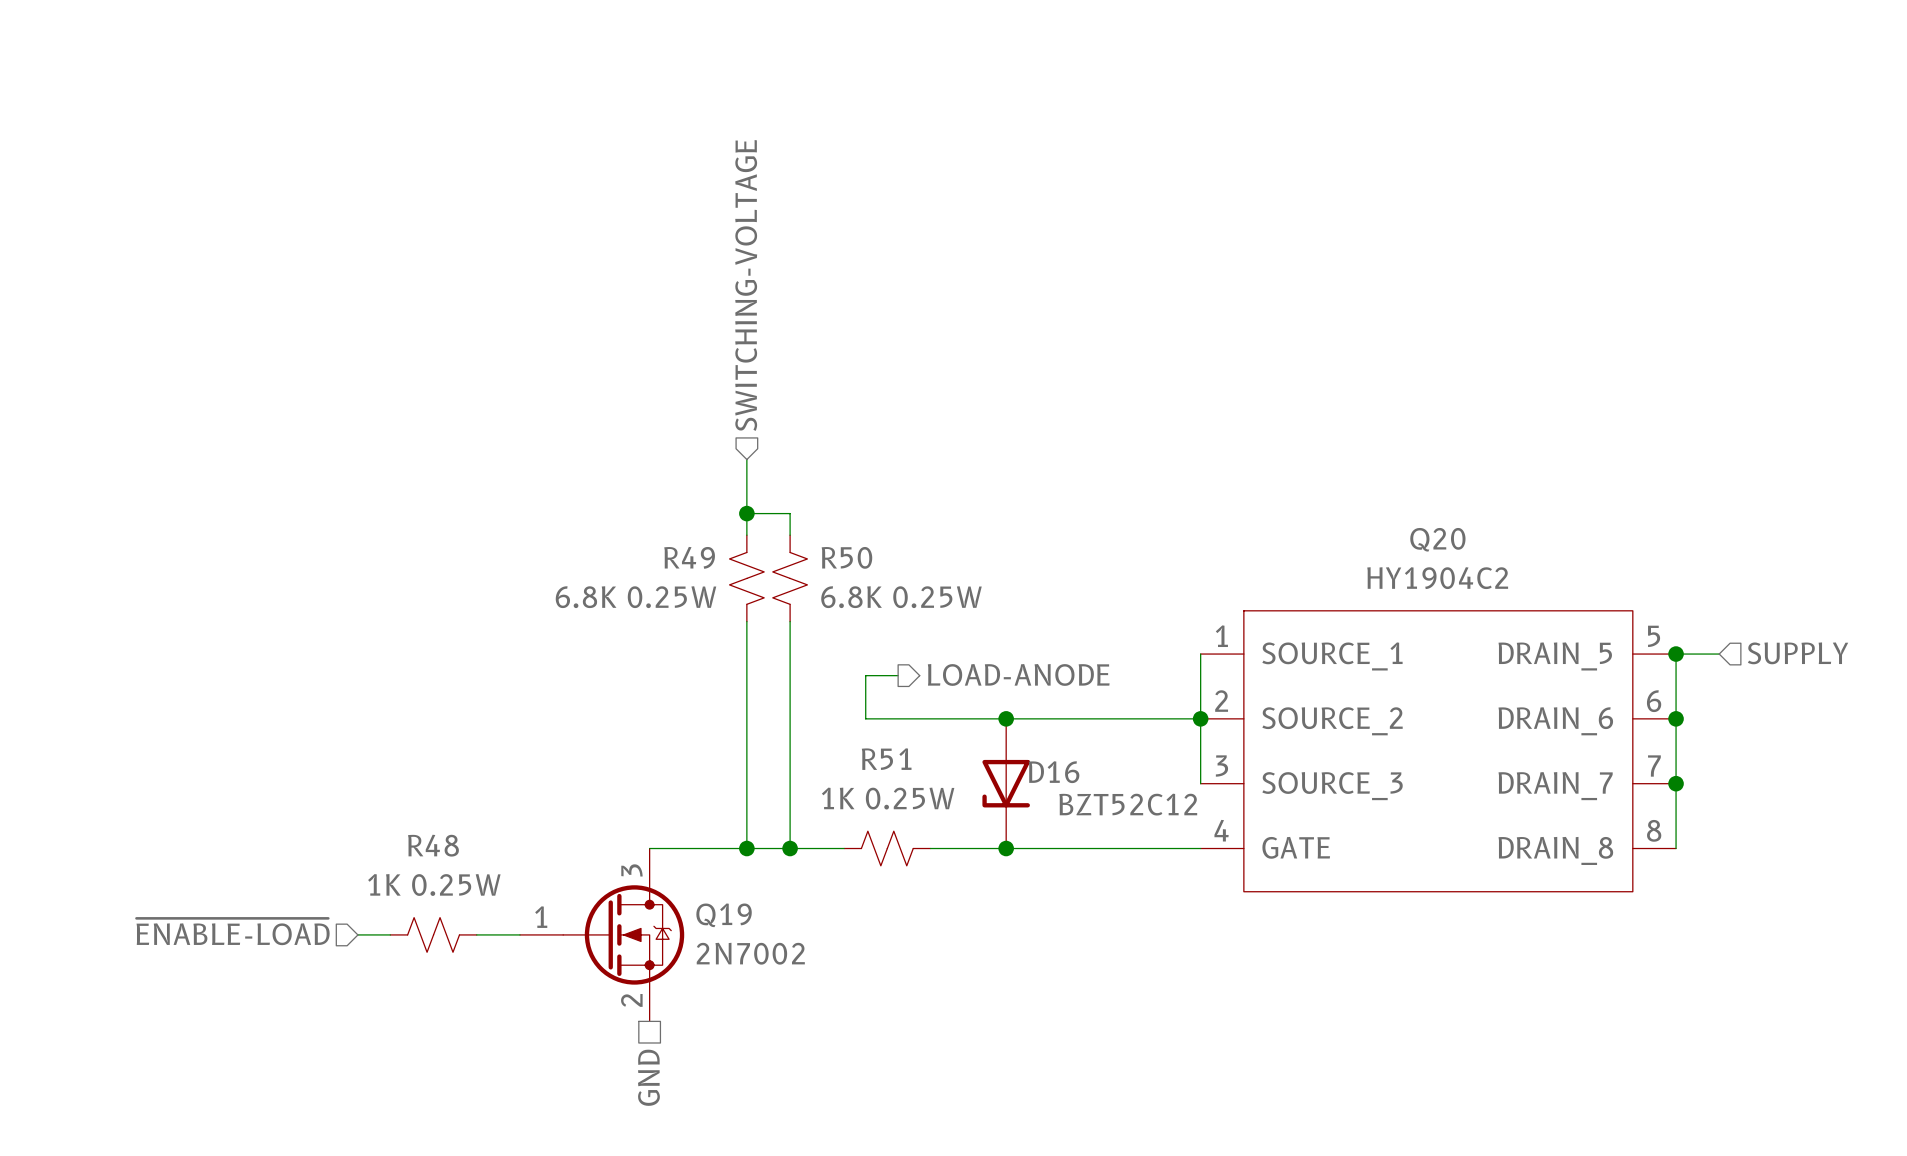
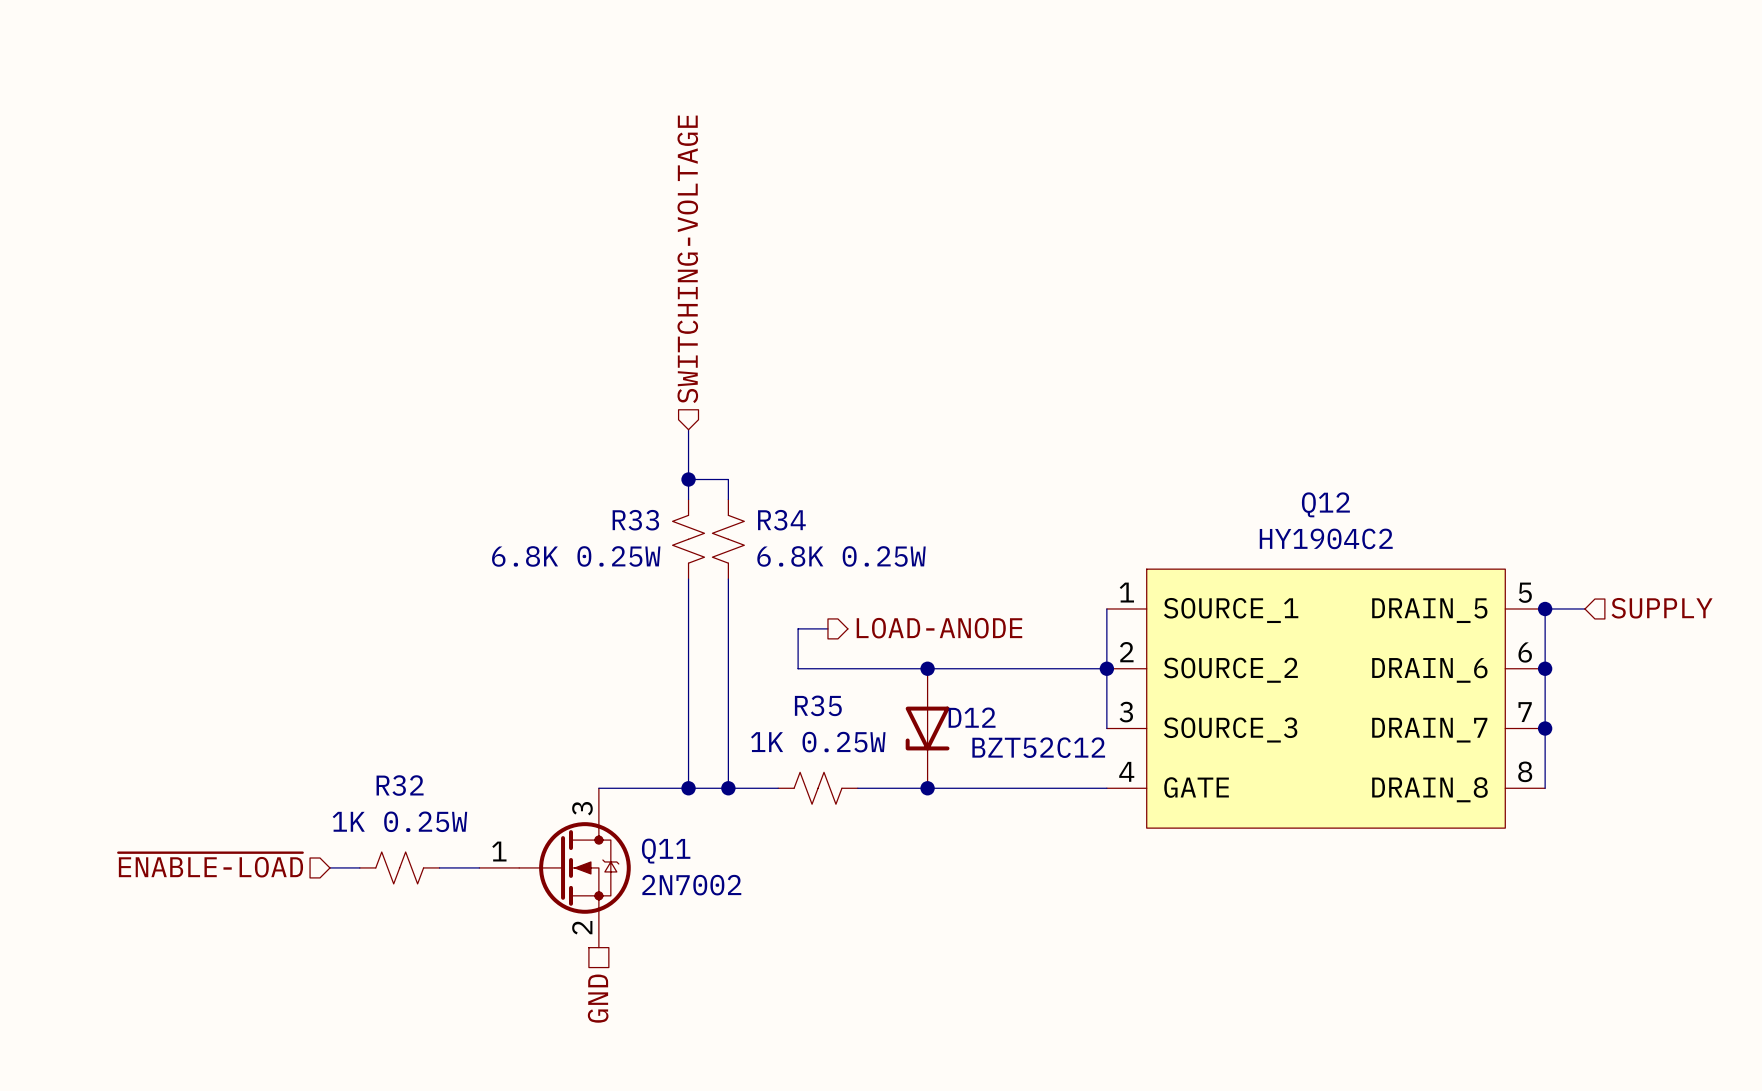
Q20 name: Q20 (1437, 539) -> Q12 (1325, 504)
R49 name: R49 (689, 557) -> R33 (635, 520)
R50 name: R50 (846, 557) -> R34 (781, 520)
R51 name: R51 (886, 759) -> R35 (818, 705)
D16 name: D16 (1054, 772) -> D12 (972, 717)
R48 name: R48 (433, 845) -> R32 (400, 785)
Q19 name: Q19 (724, 915) -> Q11 (666, 851)

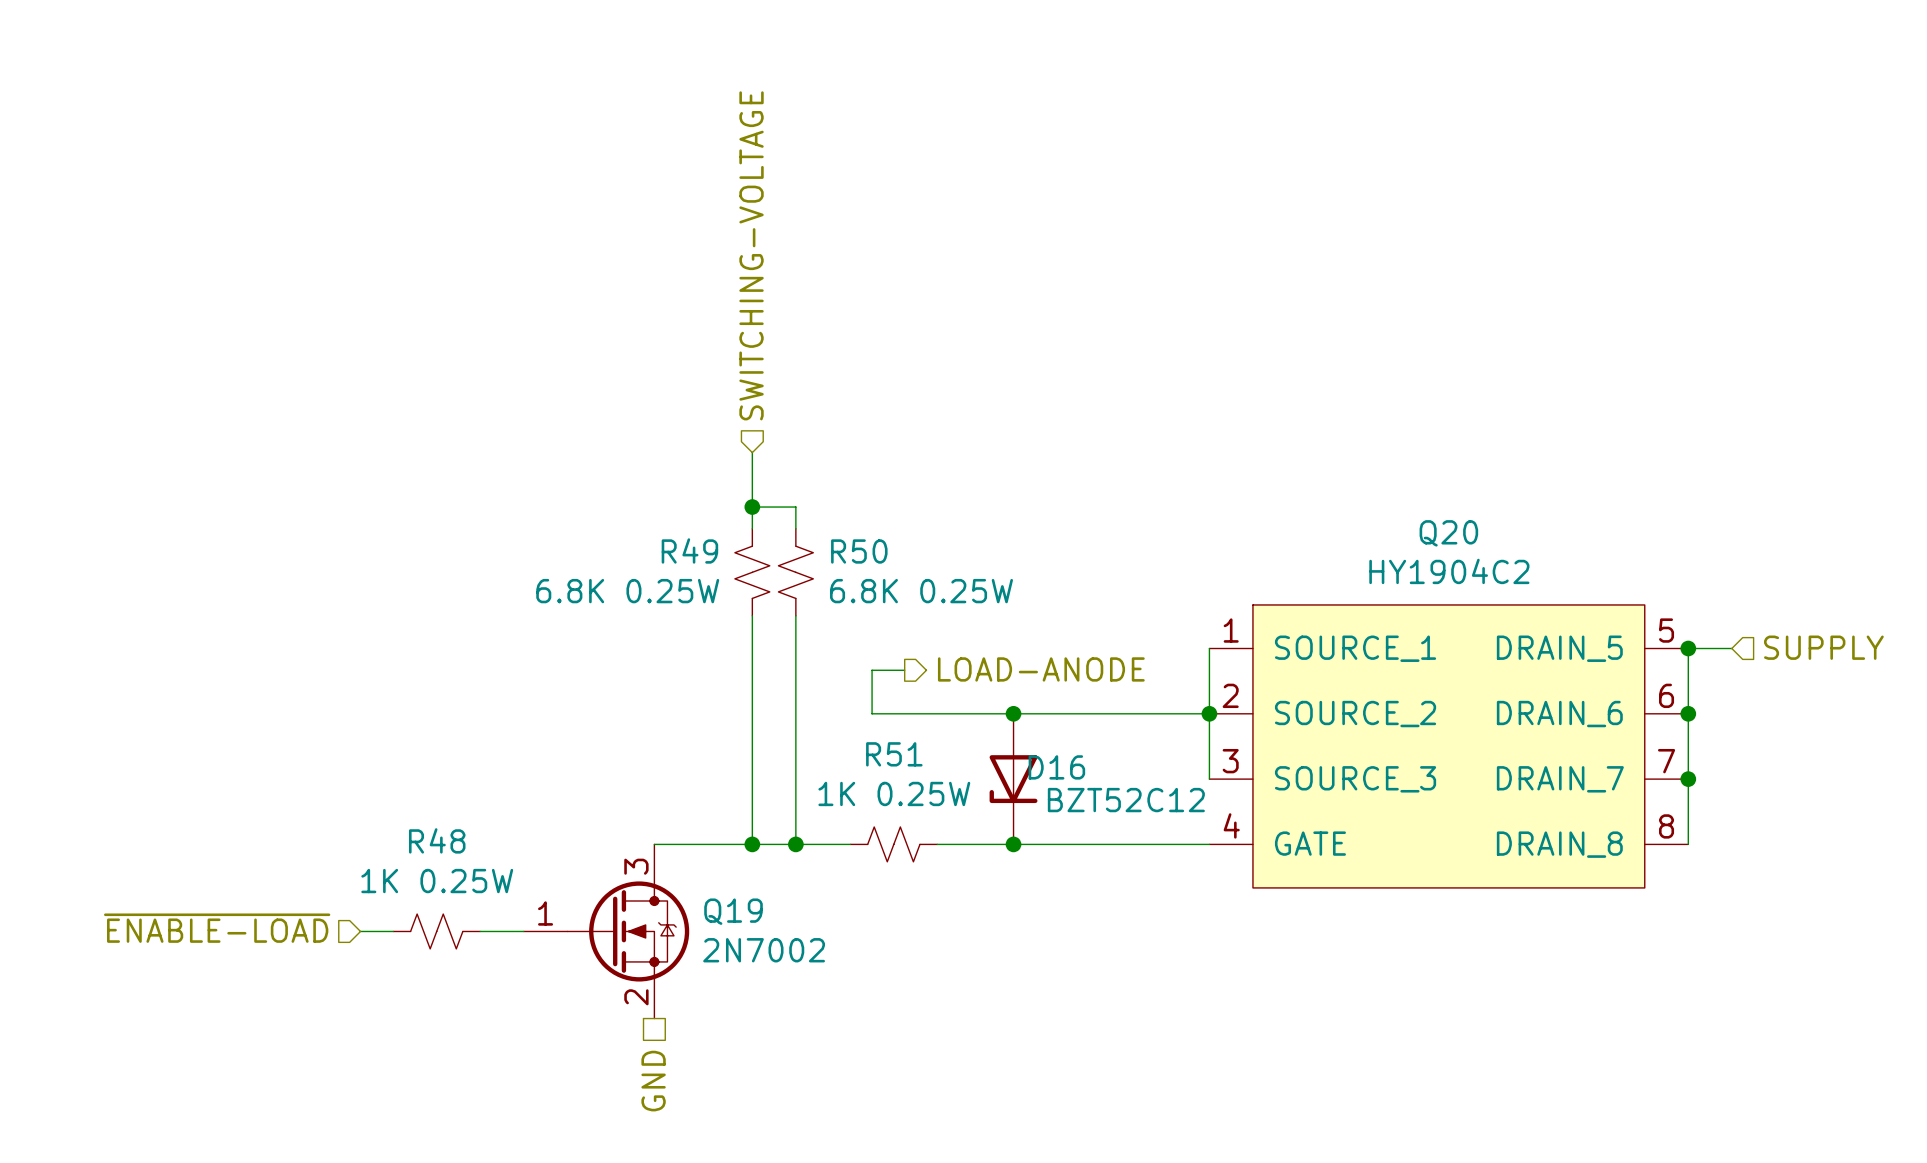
Q12 name: Q12 (1325, 504) -> Q20 (1448, 533)
R33 name: R33 (635, 520) -> R49 (689, 550)
R34 name: R34 (781, 520) -> R50 (859, 551)
R35 name: R35 (818, 705) -> R51 (894, 754)
D12 name: D12 (972, 717) -> D16 (1056, 767)
R32 name: R32 (400, 785) -> R48 (437, 840)
Q11 name: Q11 (666, 851) -> Q19 (733, 911)

